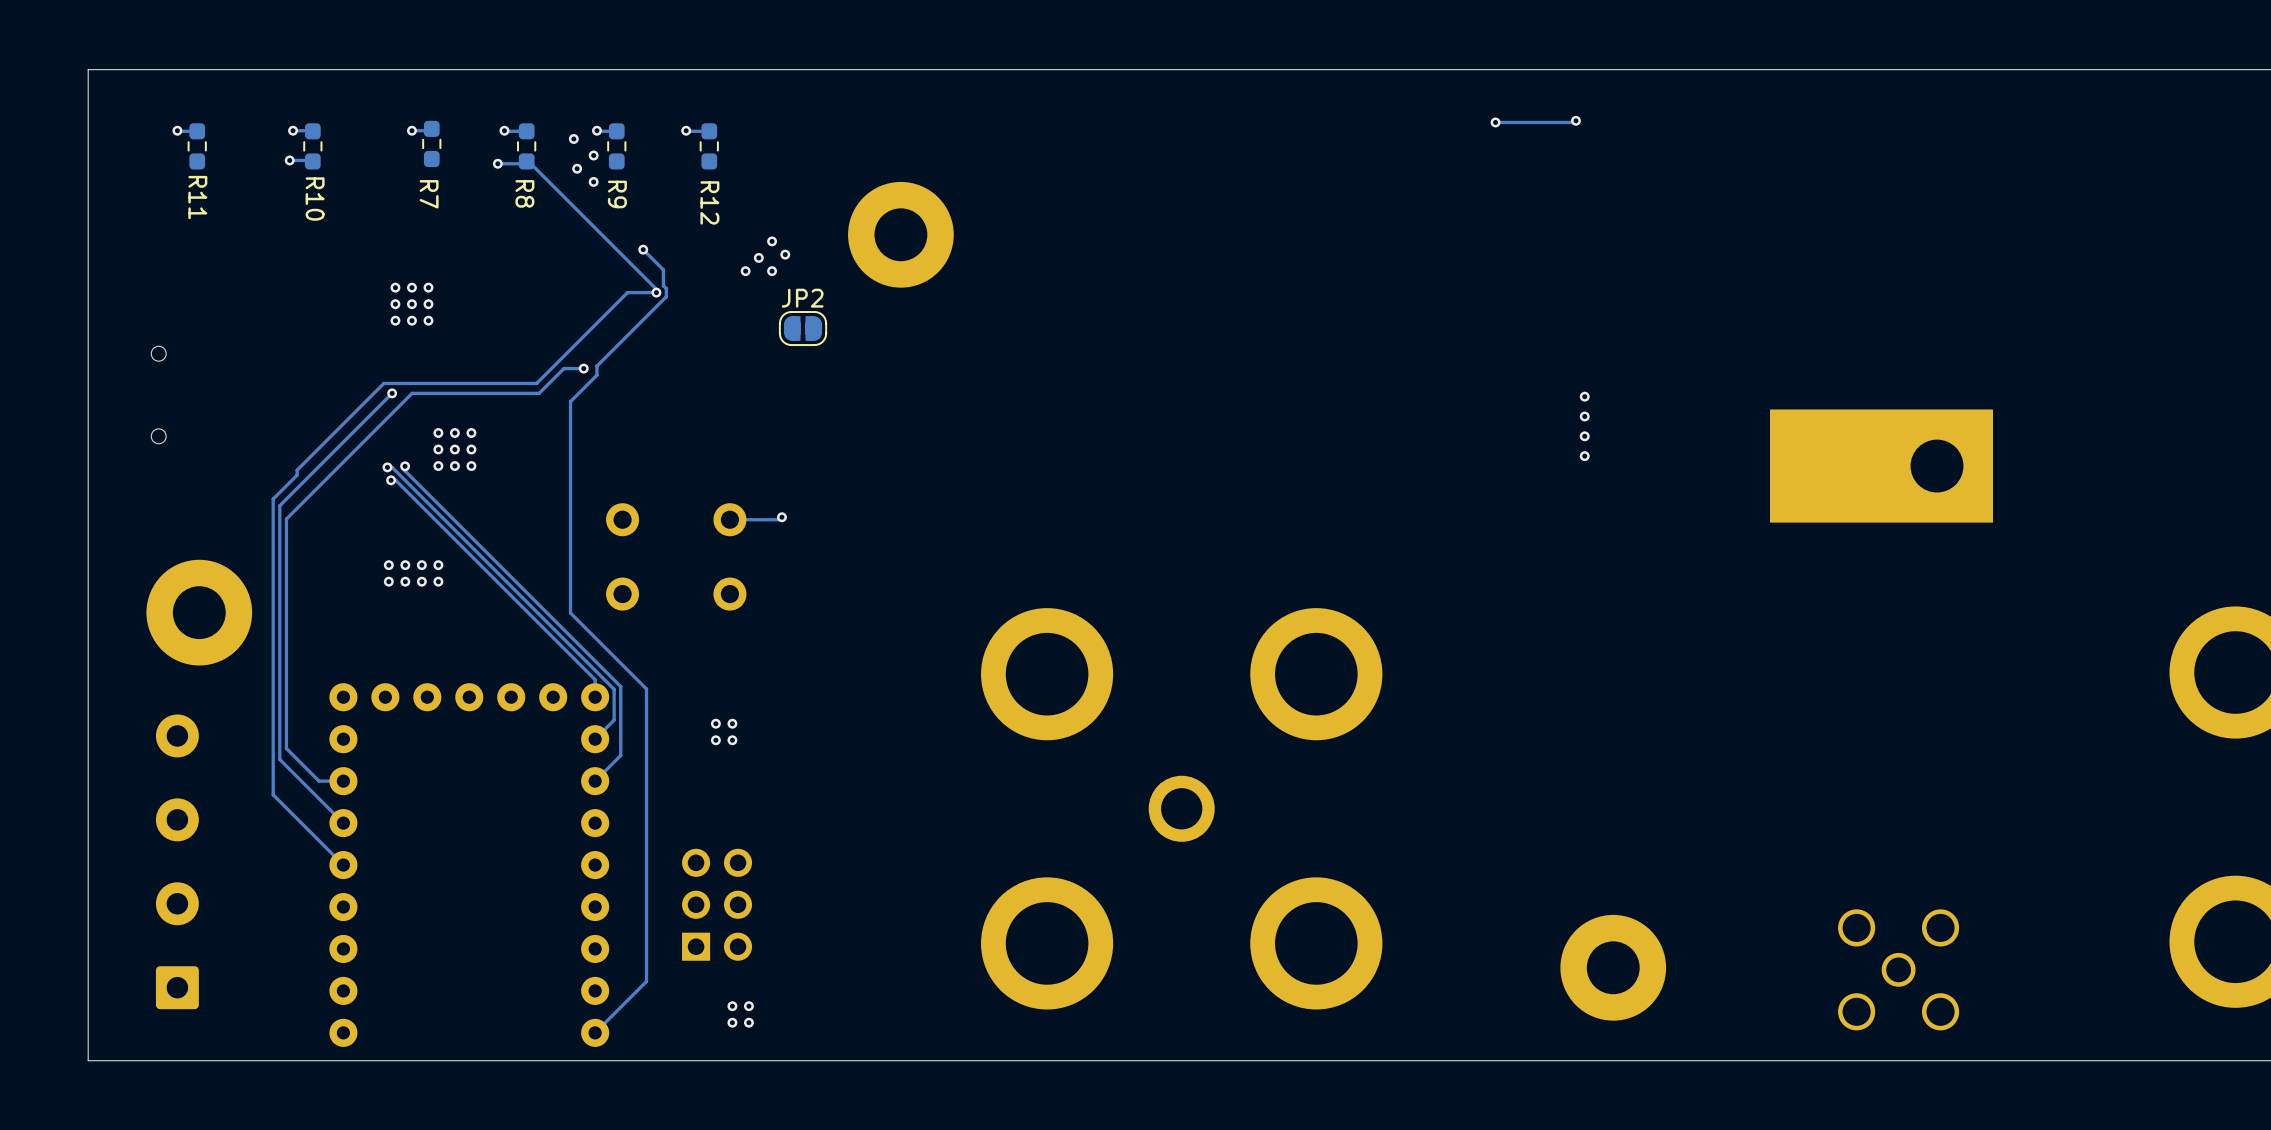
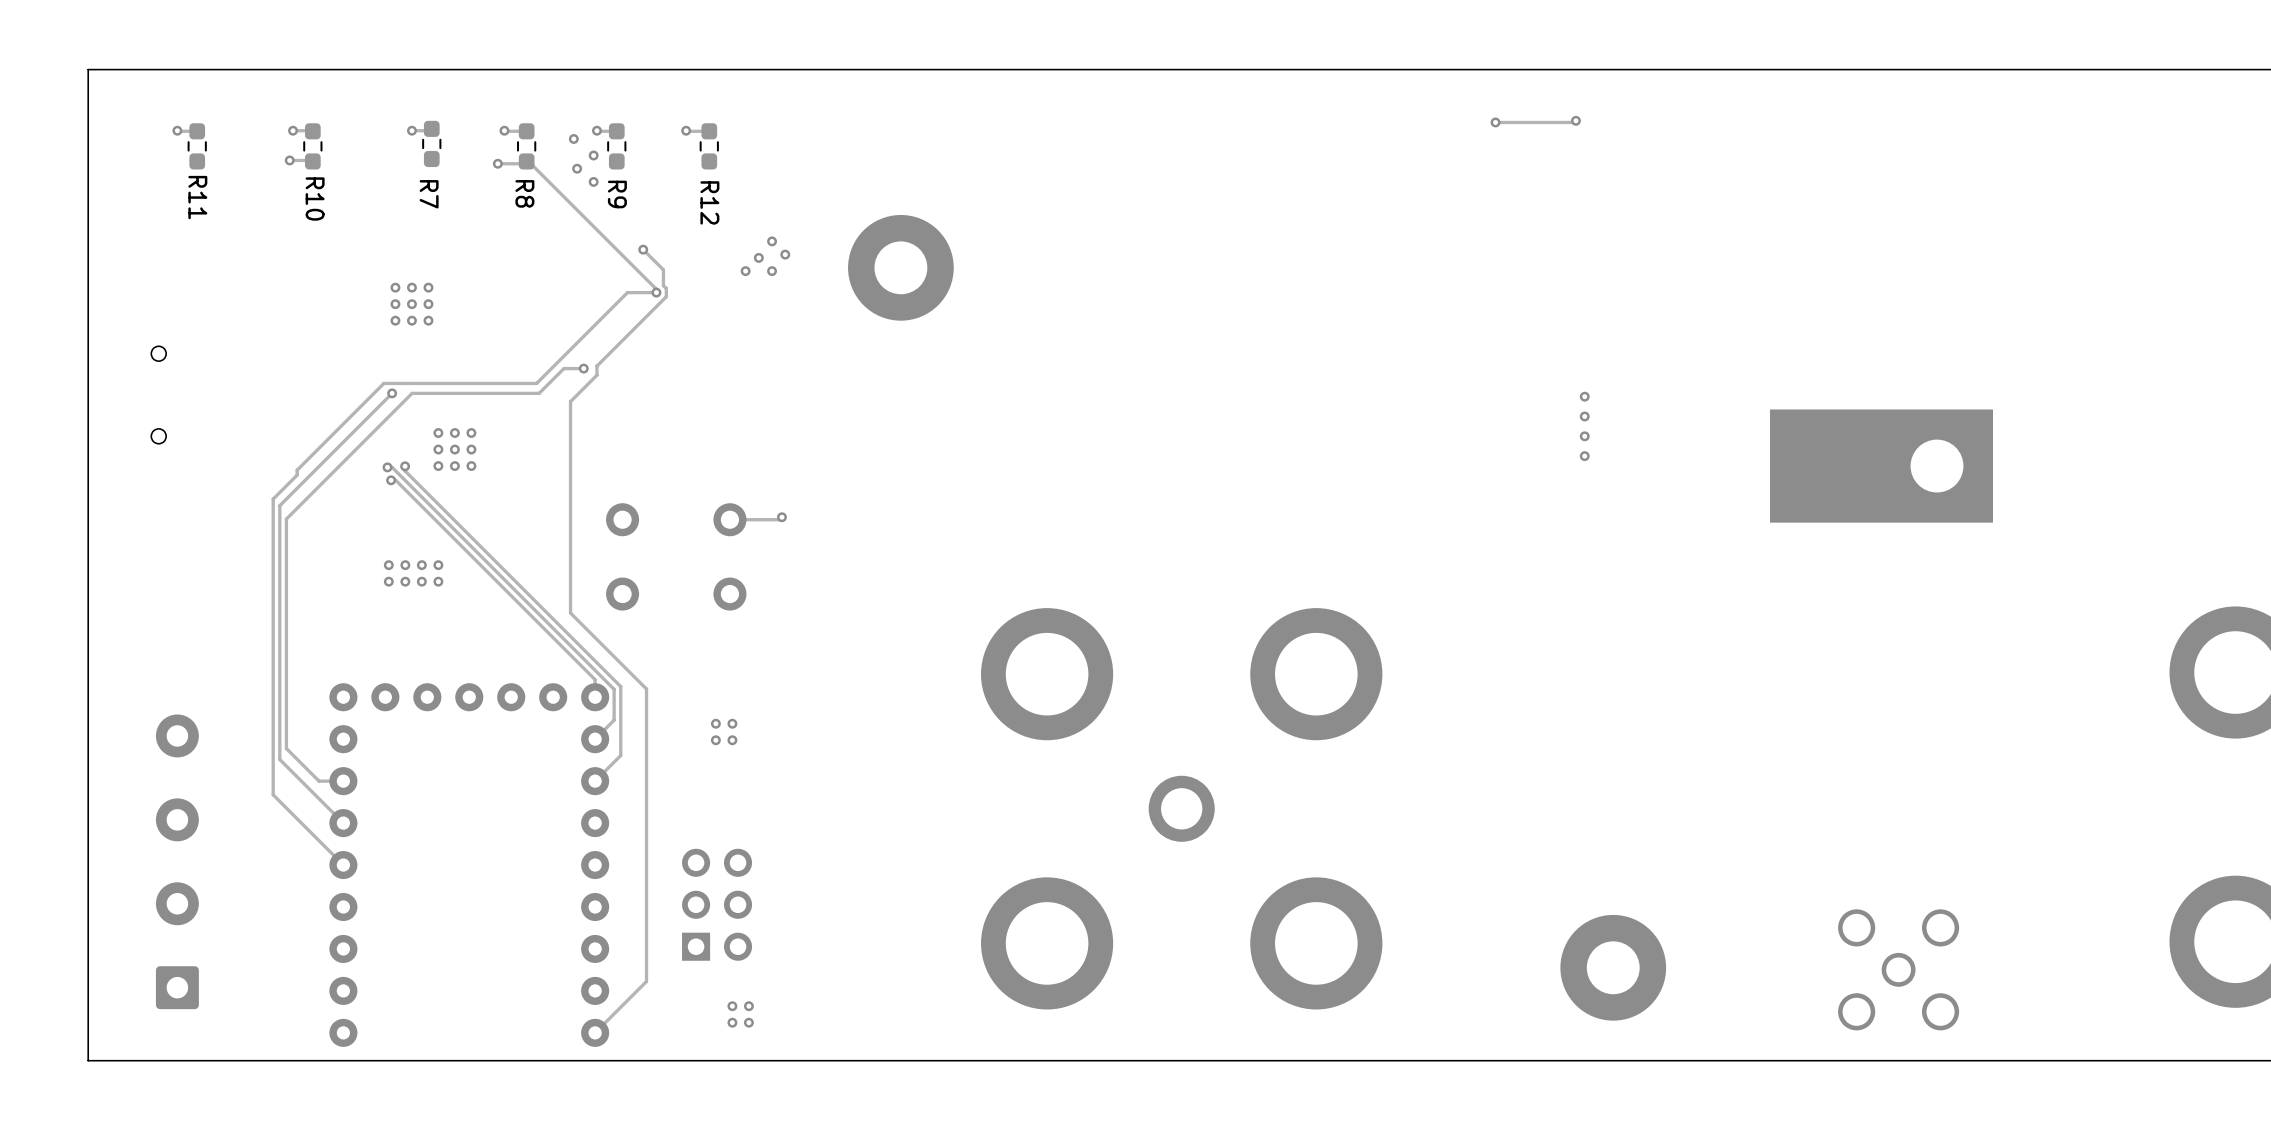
part position: (900, 234) -> (900, 267)
JP2: (803, 328) -> none
part: (199, 612) -> none

